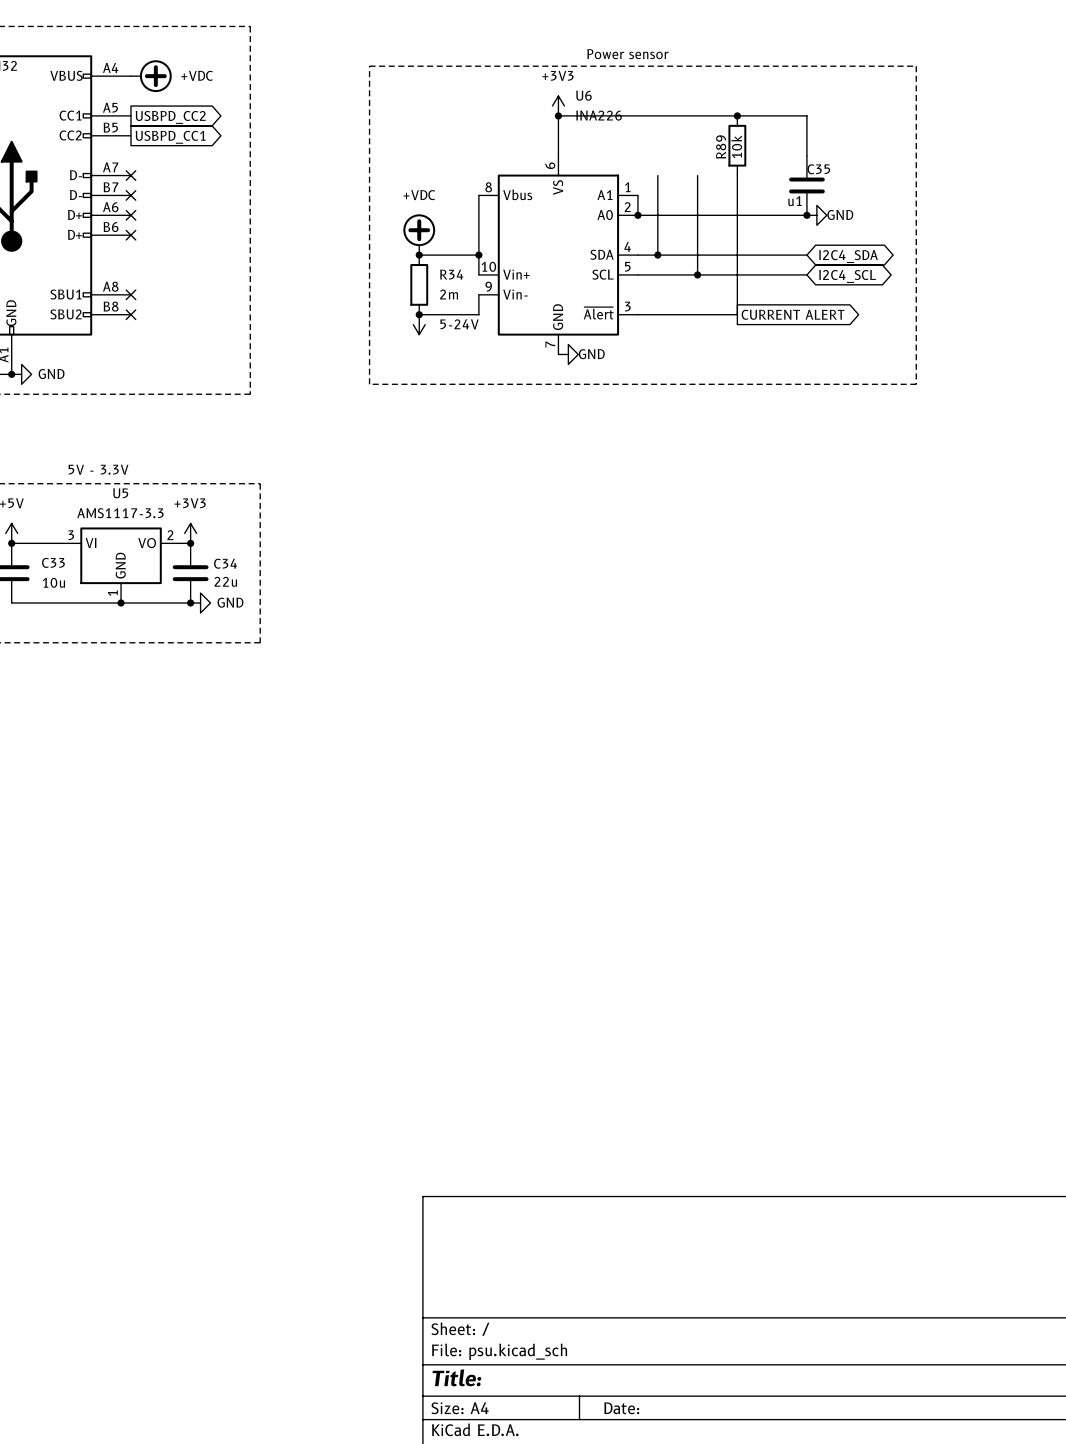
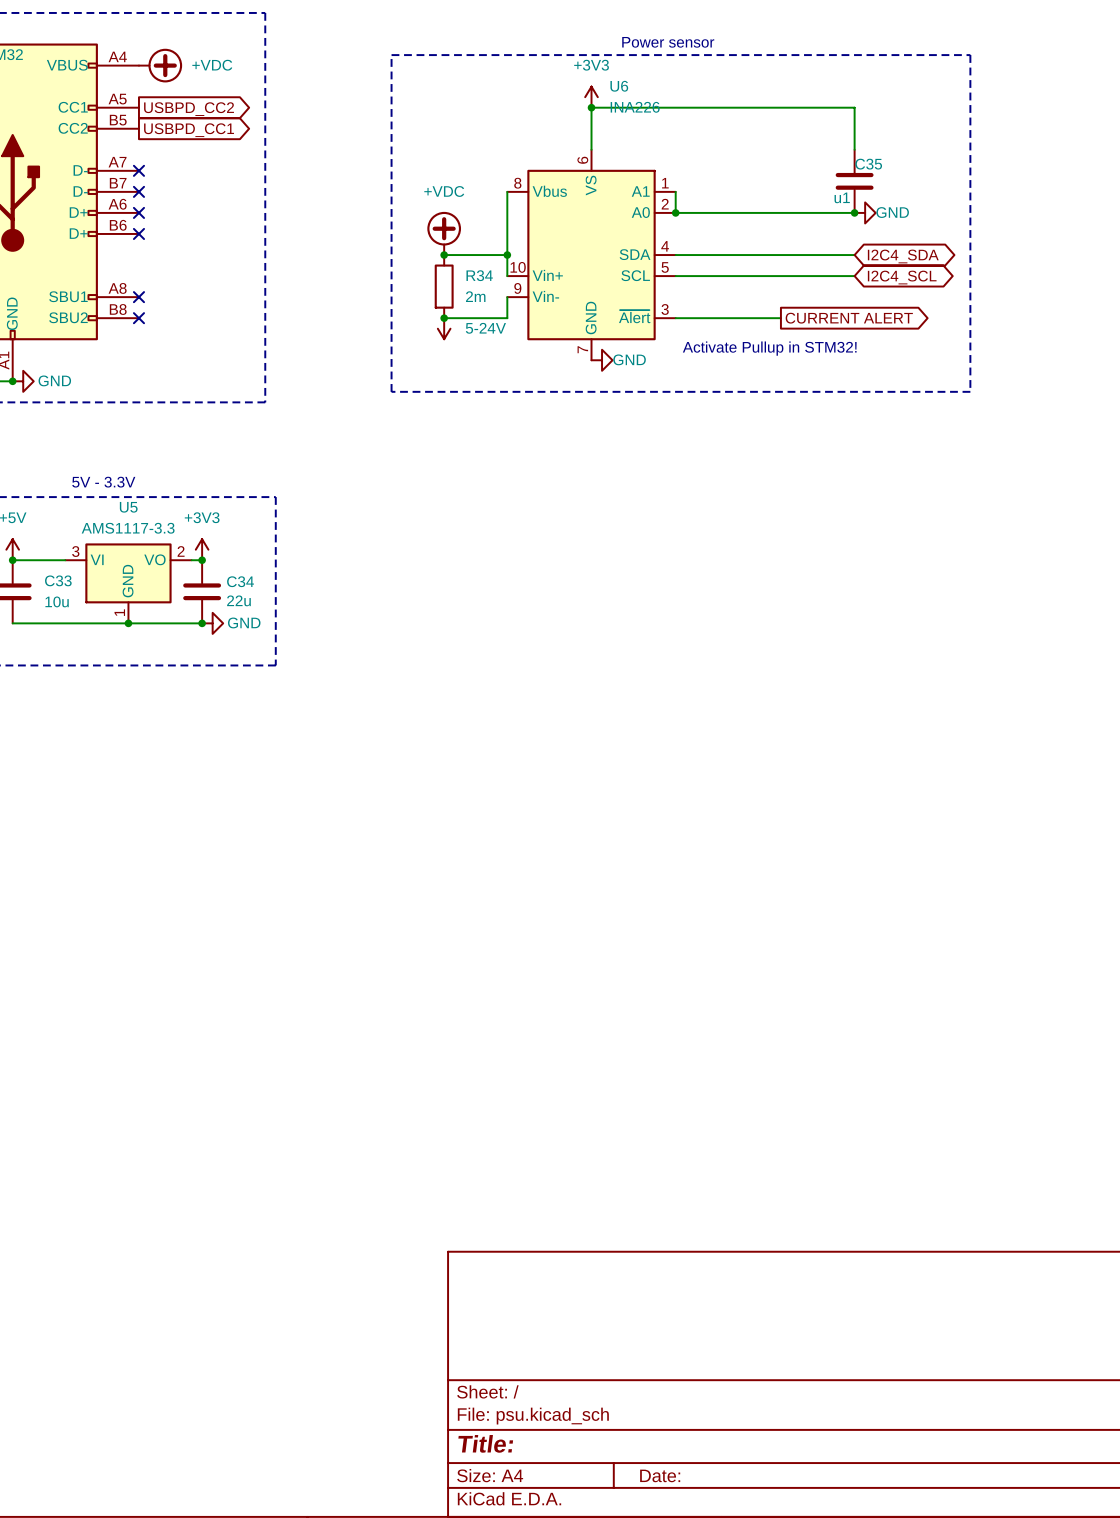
junction: (737, 115) -> none
R89: 10k (737, 145) -> none
wire: (657, 175) (657, 255) -> none
wire: (697, 175) (697, 274) -> none
wire: (737, 175) (737, 314) -> none
junction: (657, 255) -> none
junction: (697, 274) -> none
text: none -> Activate Pullup in STM32! (769, 348)

